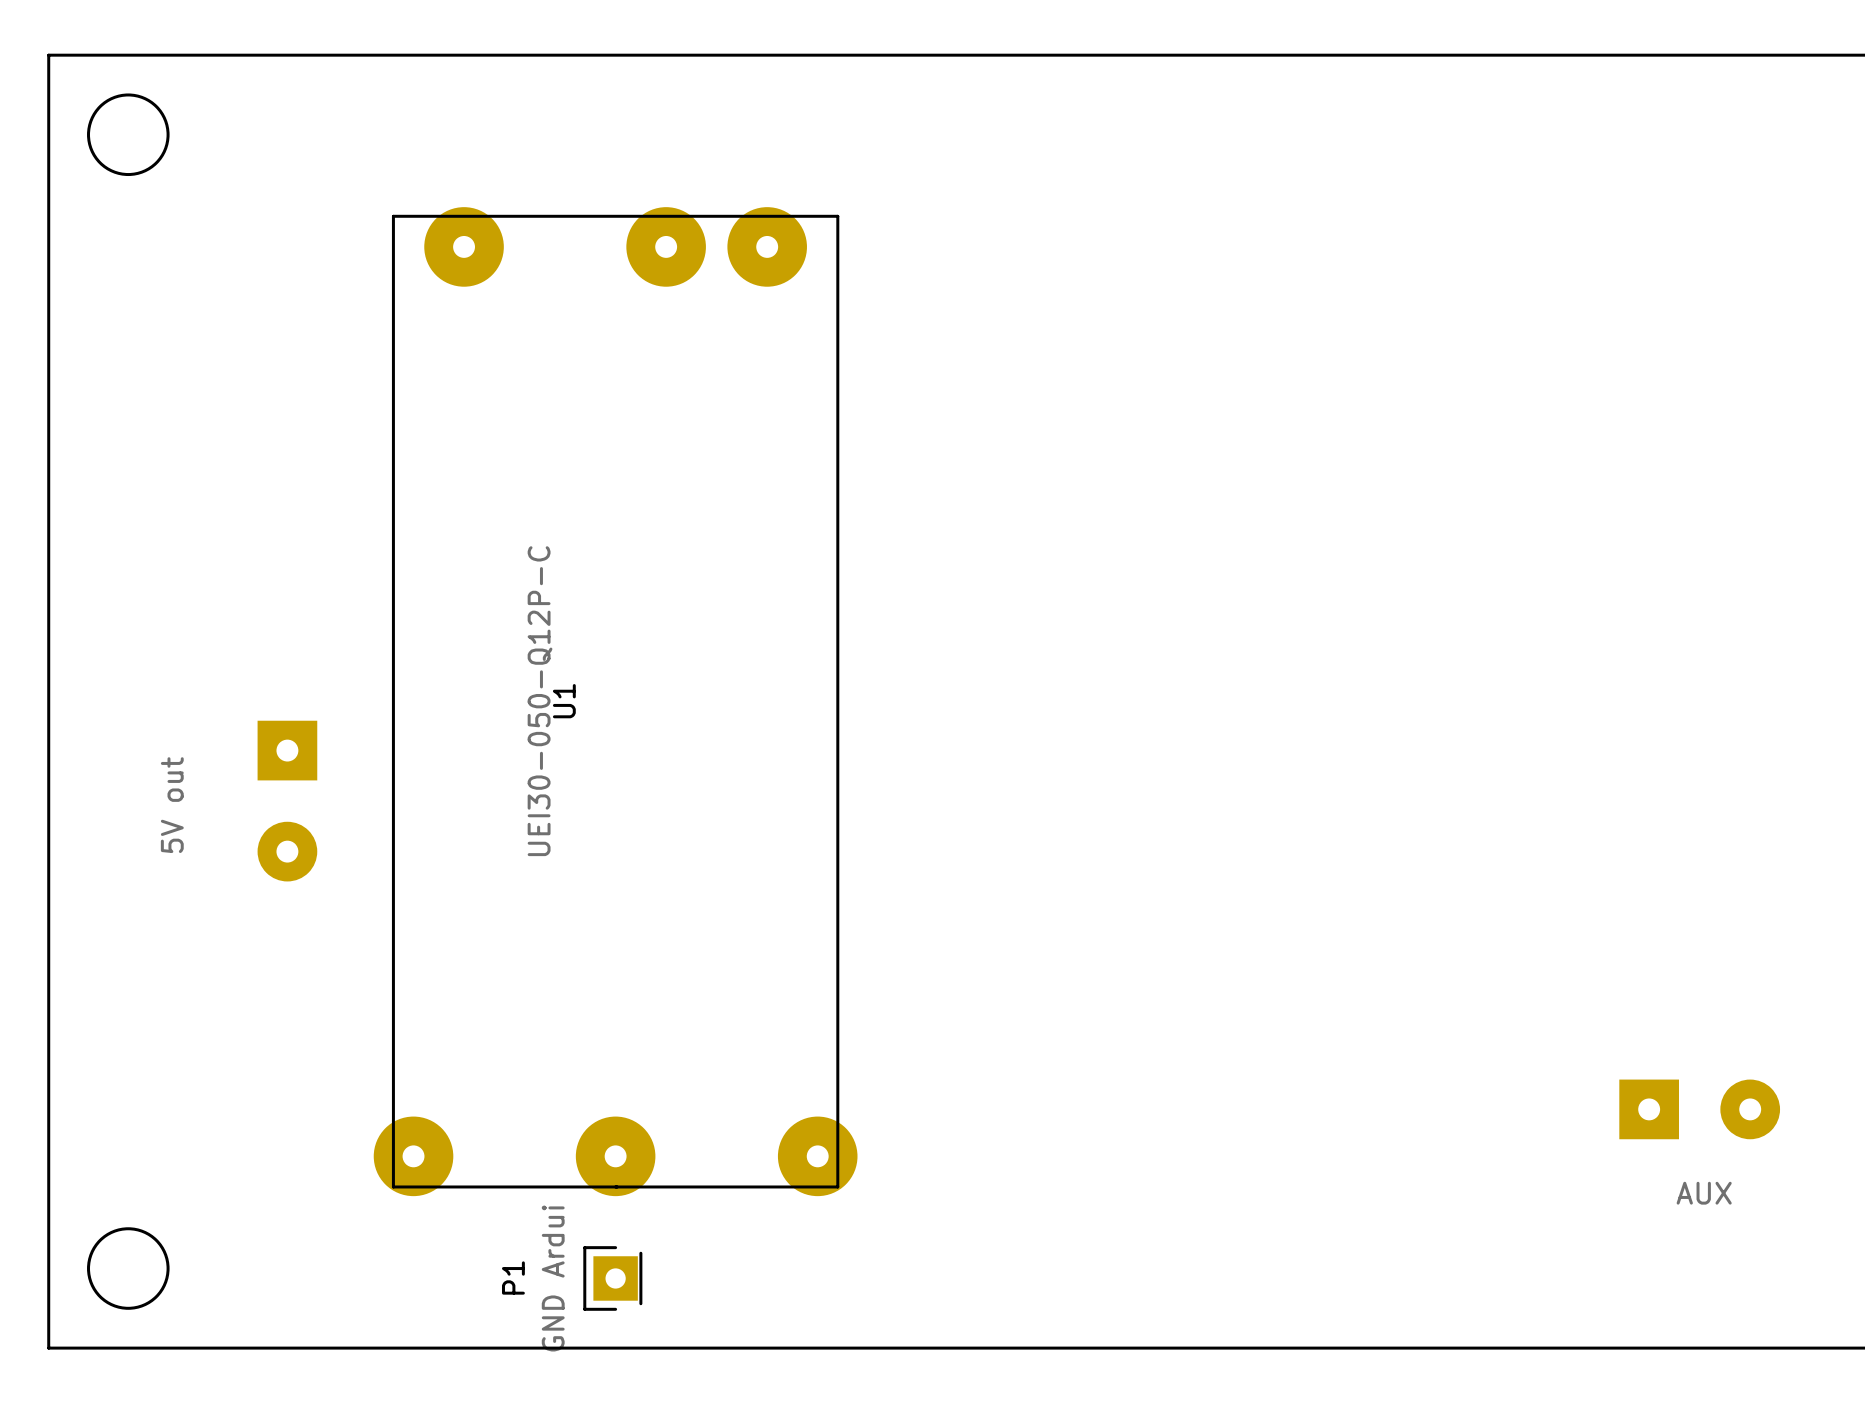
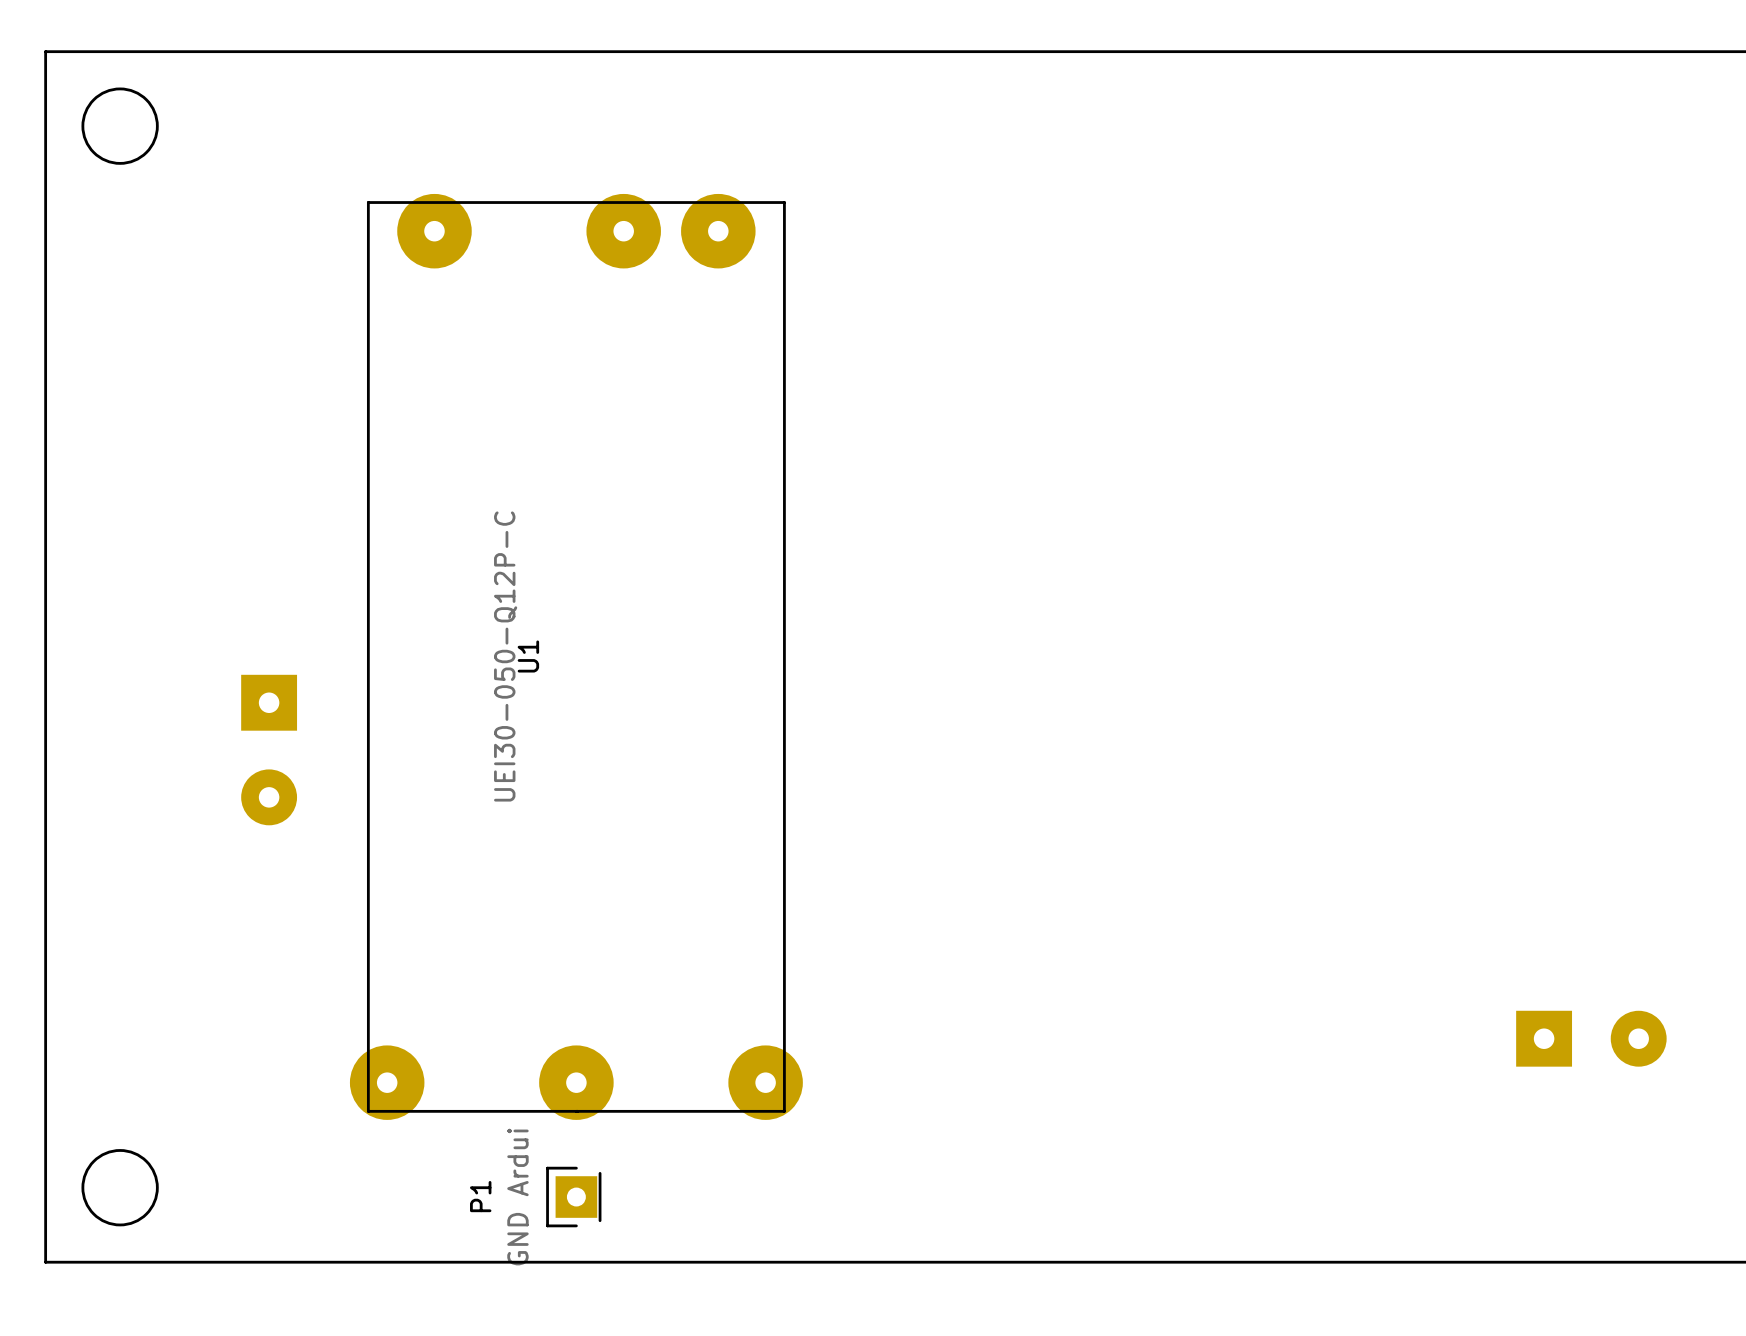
part value: 5V out (172, 805) -> none
part value: AUX (1704, 1193) -> none

